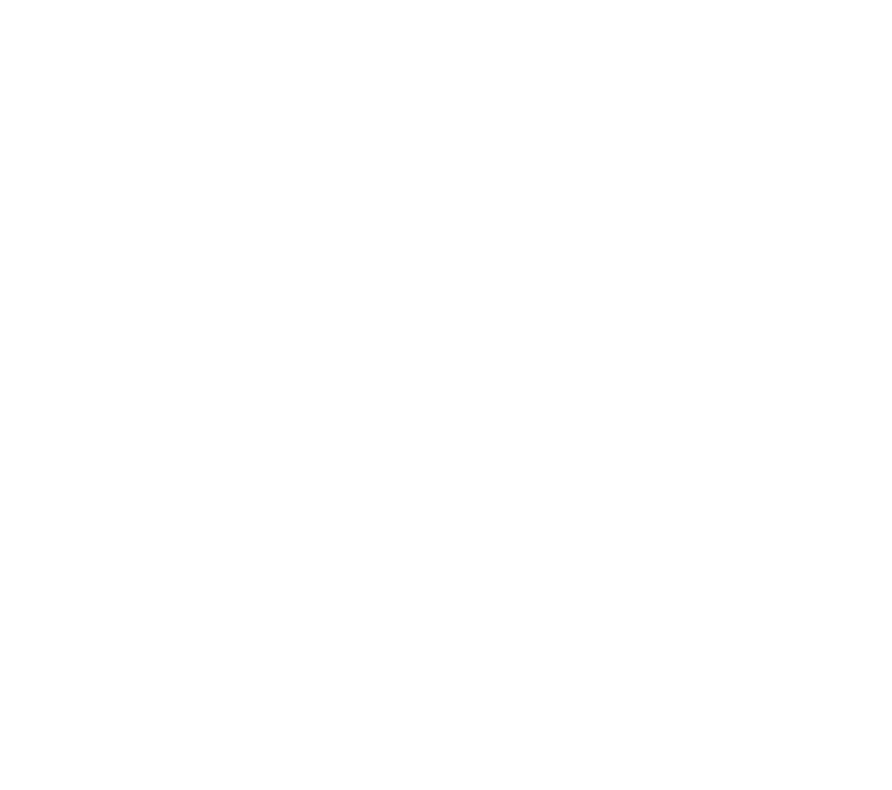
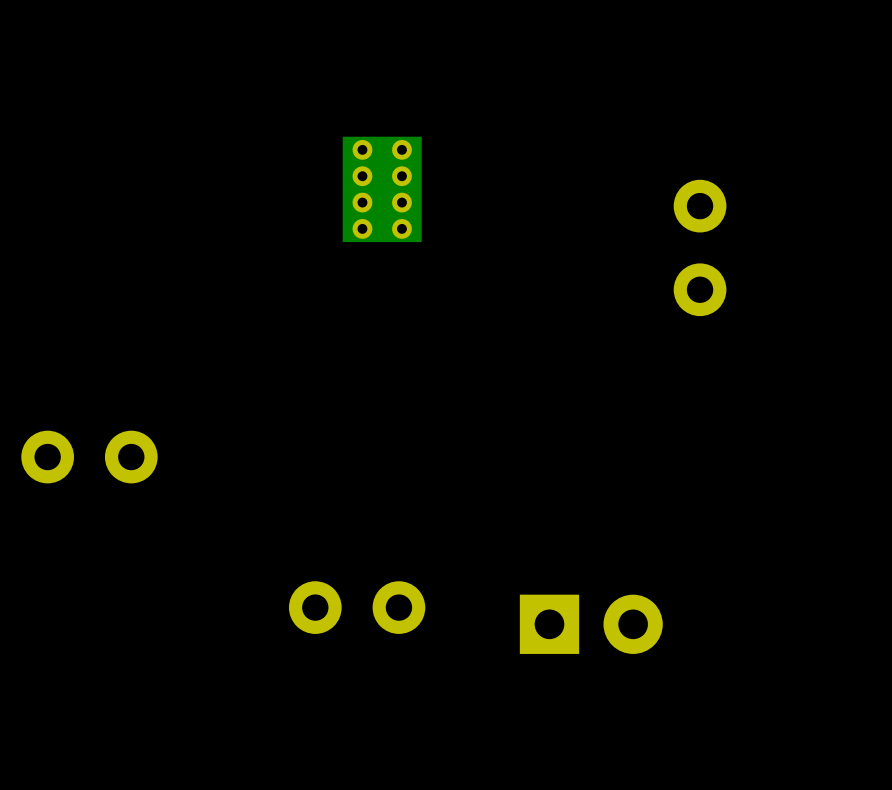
part: none -> (382, 189)
part: none -> (700, 247)
part: none -> (89, 457)
part: none -> (357, 607)
part: none -> (591, 624)

